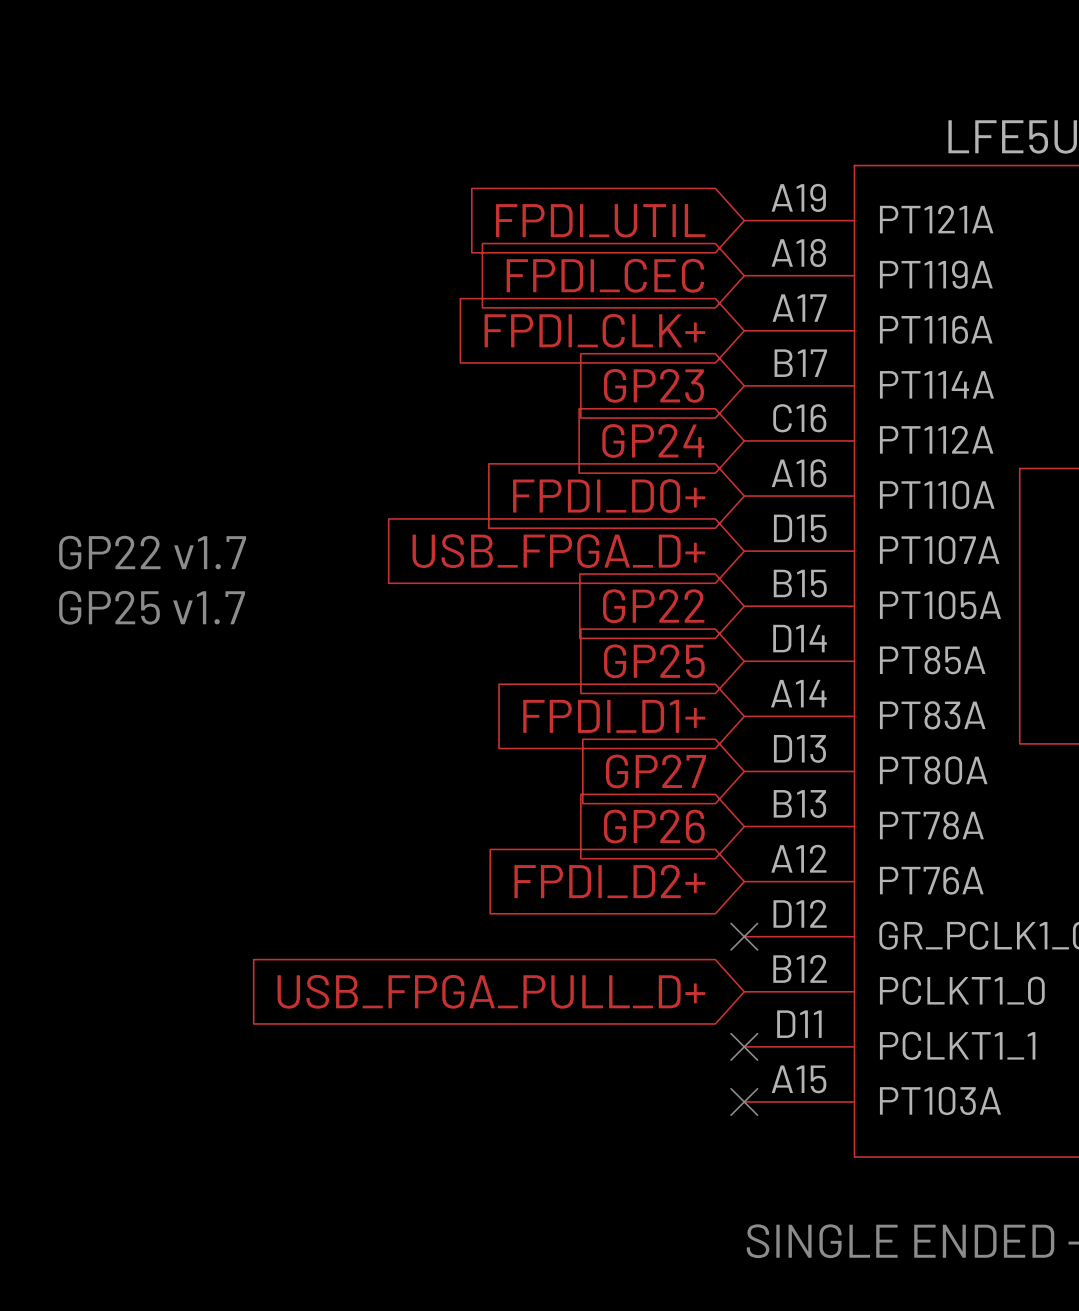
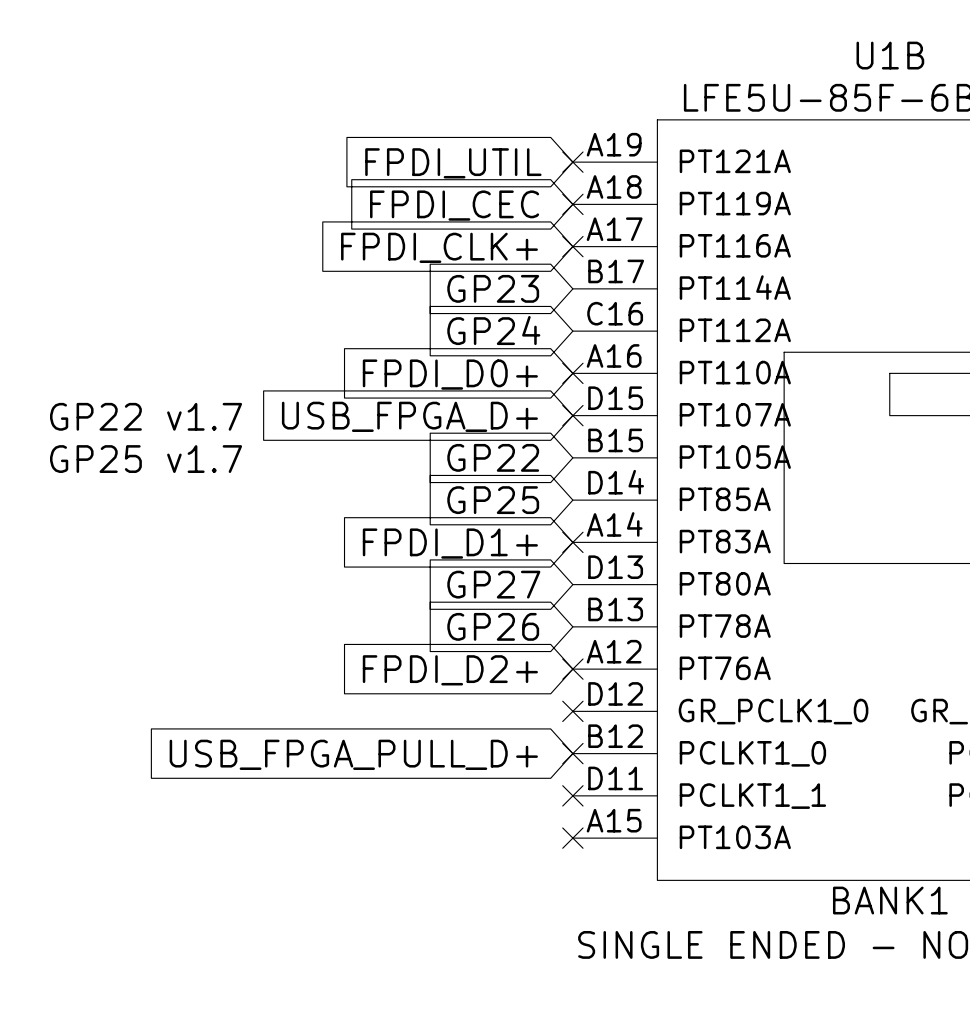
no-connect mark: none -> (572, 162)
no-connect mark: none -> (572, 204)
no-connect mark: none -> (572, 246)
no-connect mark: none -> (572, 373)
no-connect mark: none -> (572, 415)
no-connect mark: none -> (572, 542)
no-connect mark: none -> (572, 669)
no-connect mark: none -> (572, 753)

